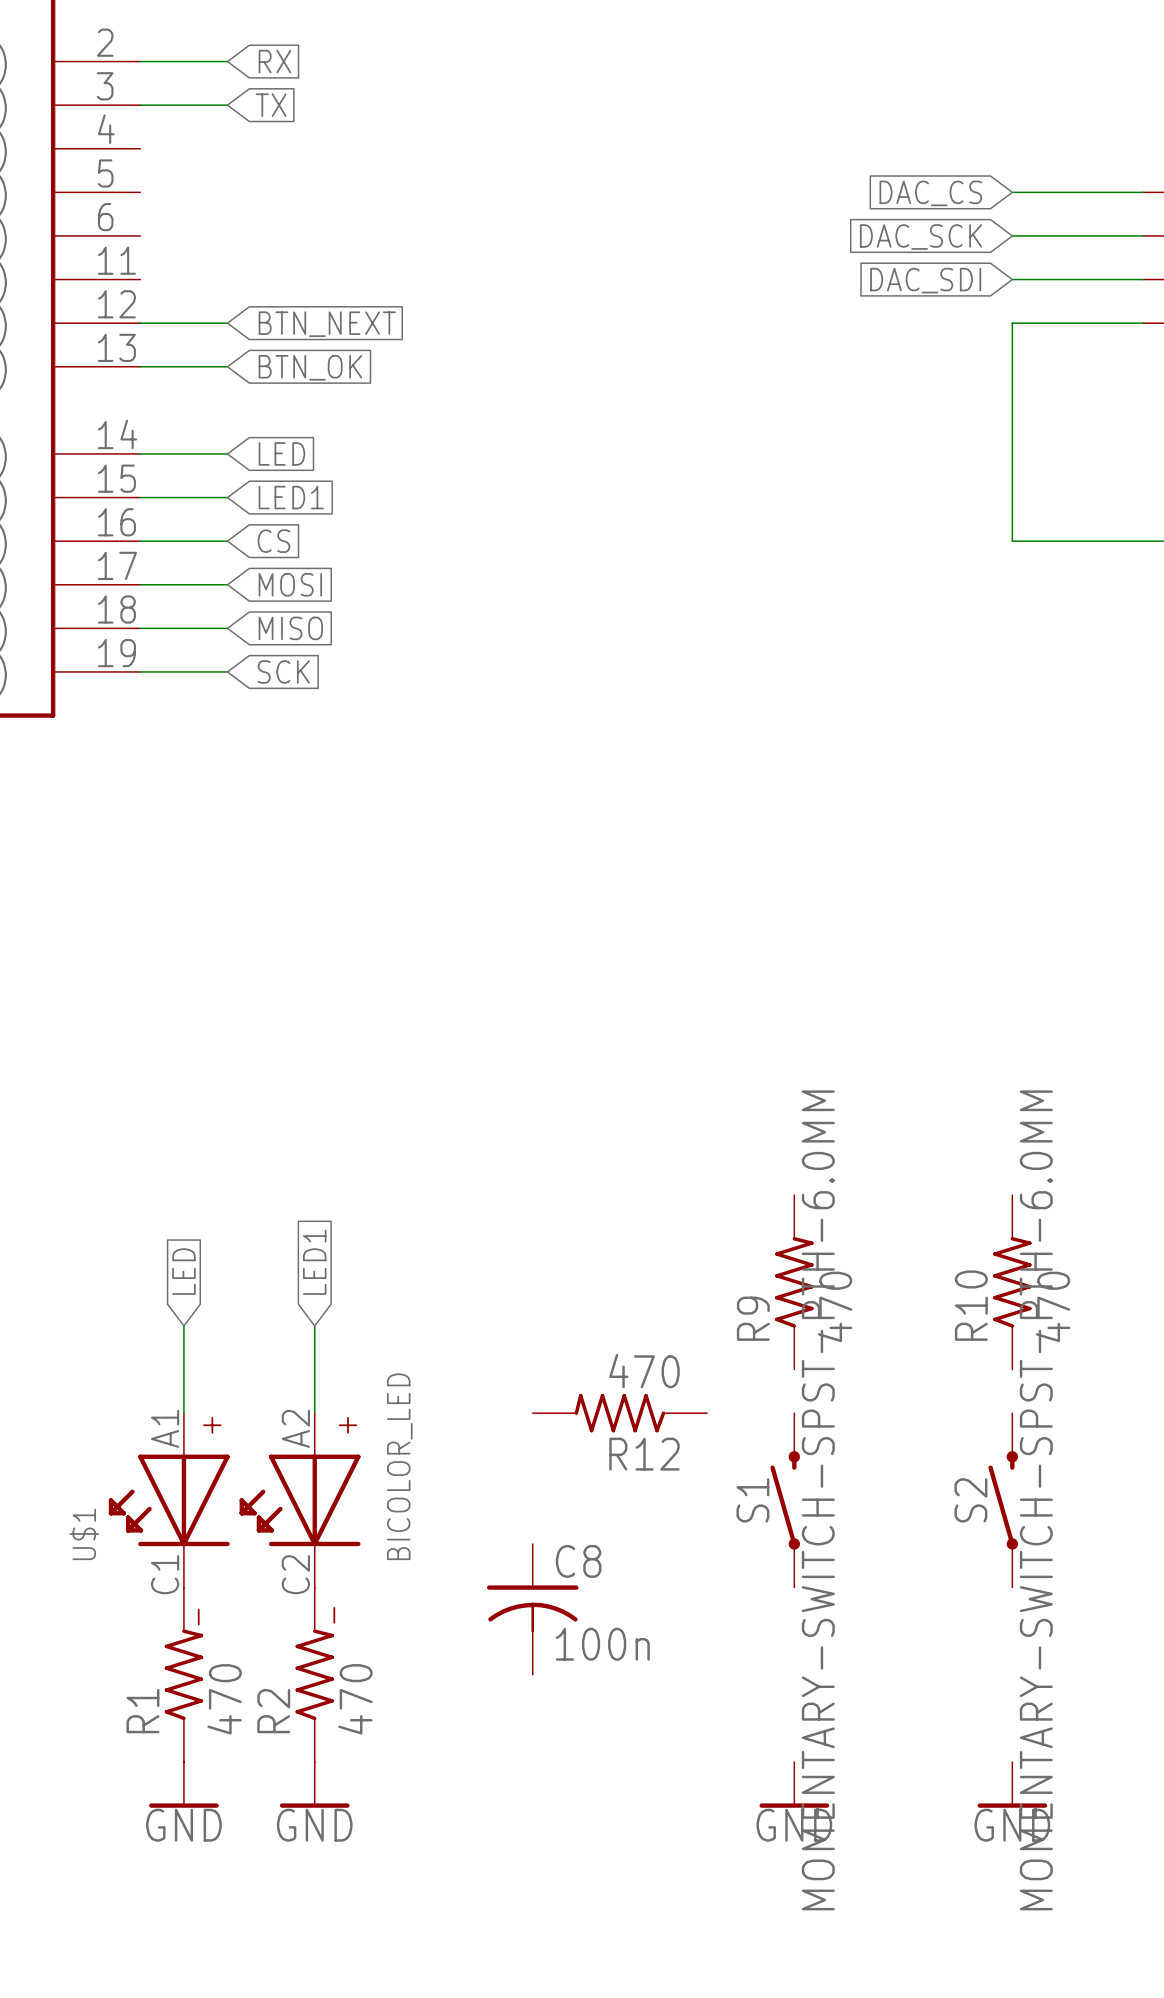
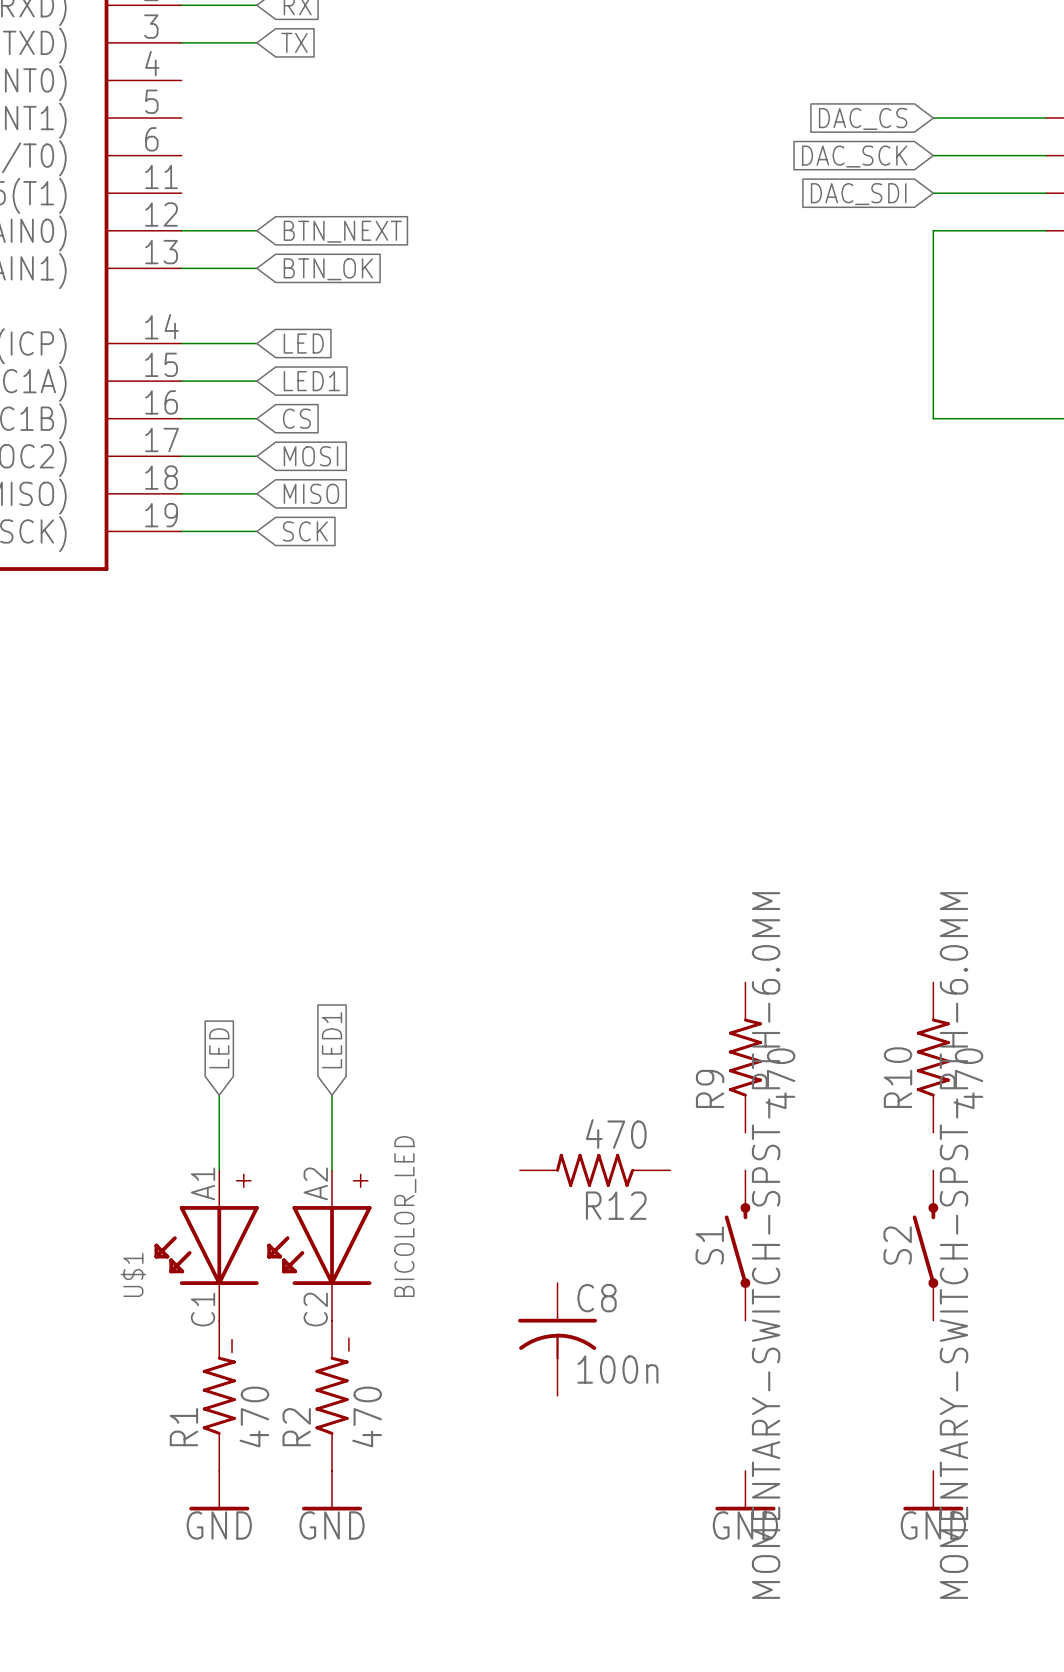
C8 position: (532, 1609) -> (557, 1339)

